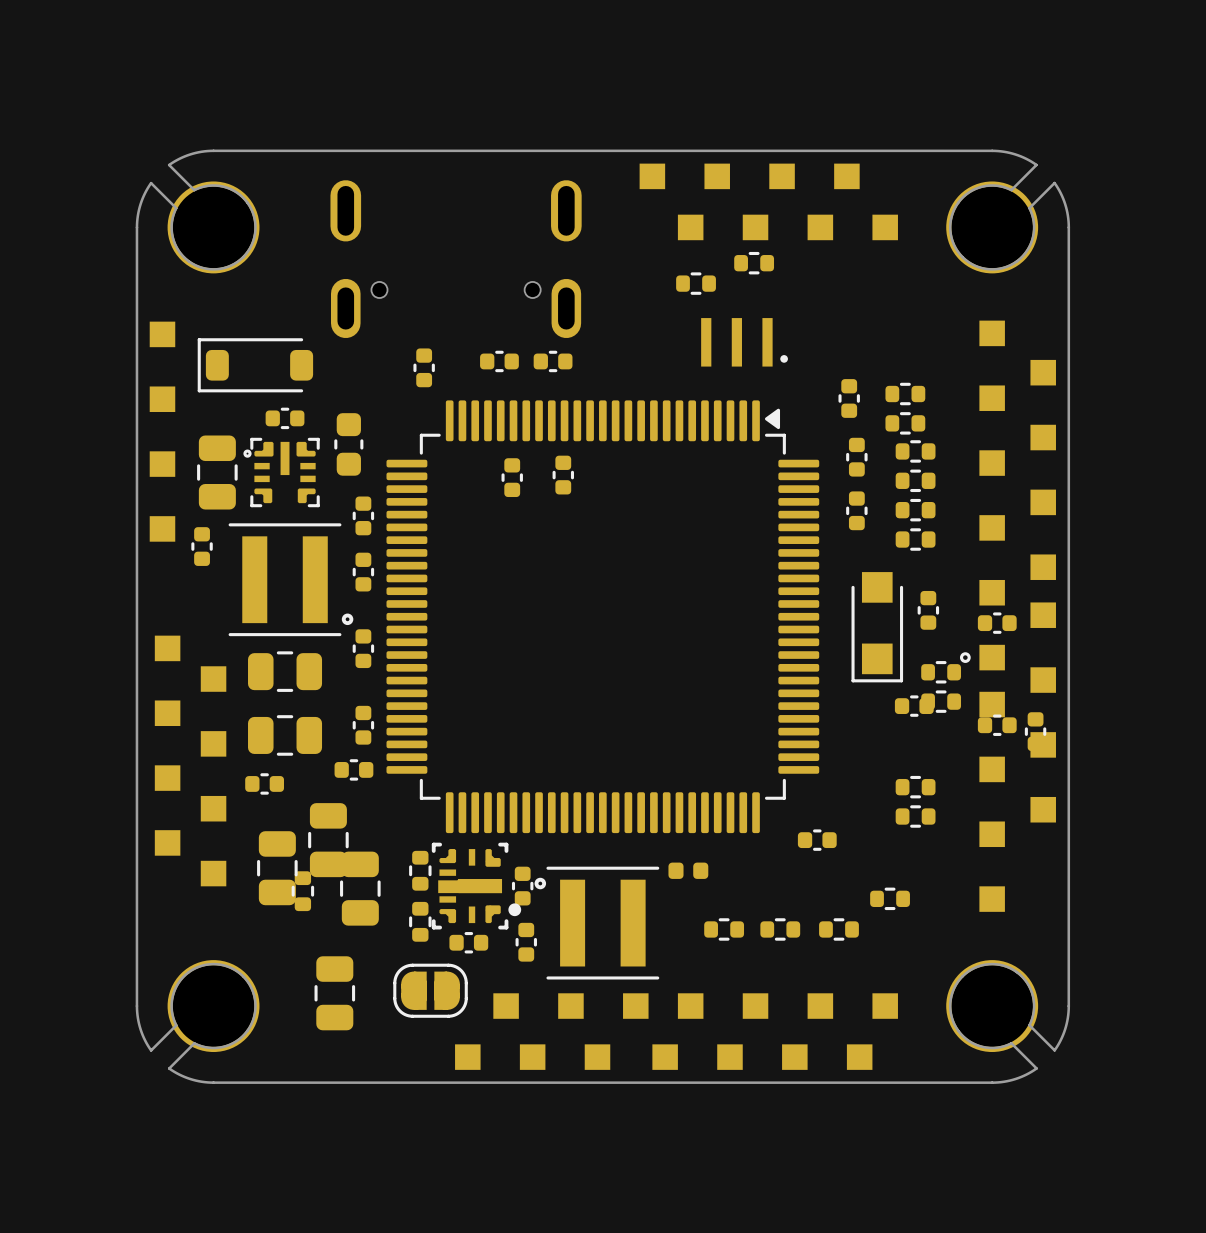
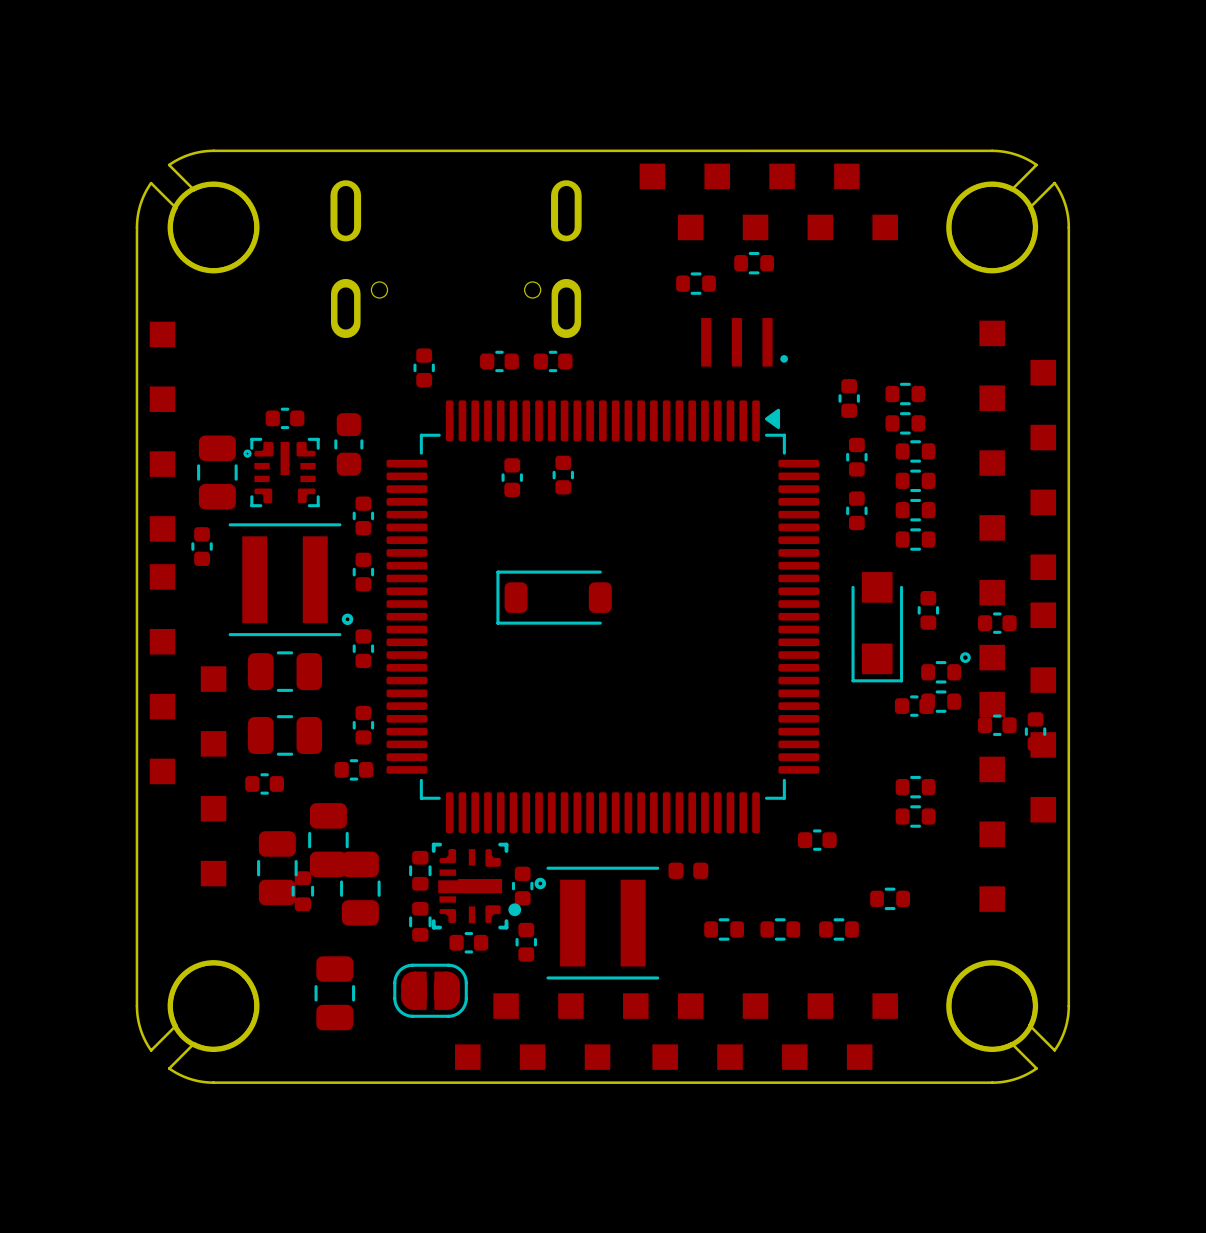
part position: (255, 365) -> (554, 597)
part position: (167, 745) -> (162, 674)

